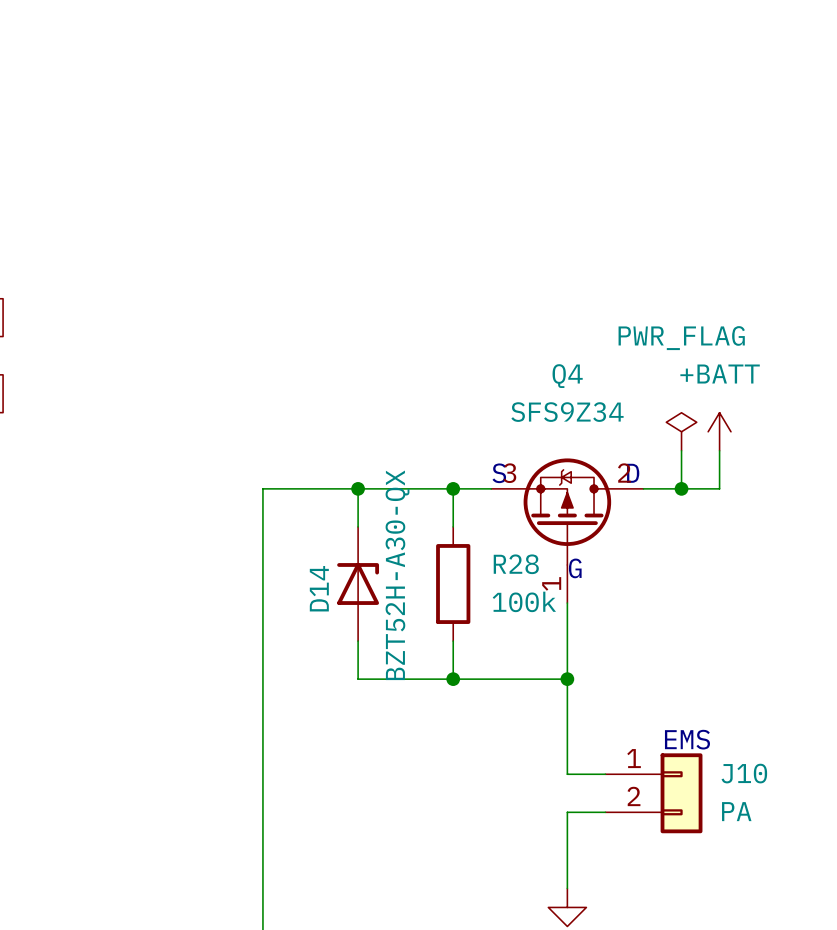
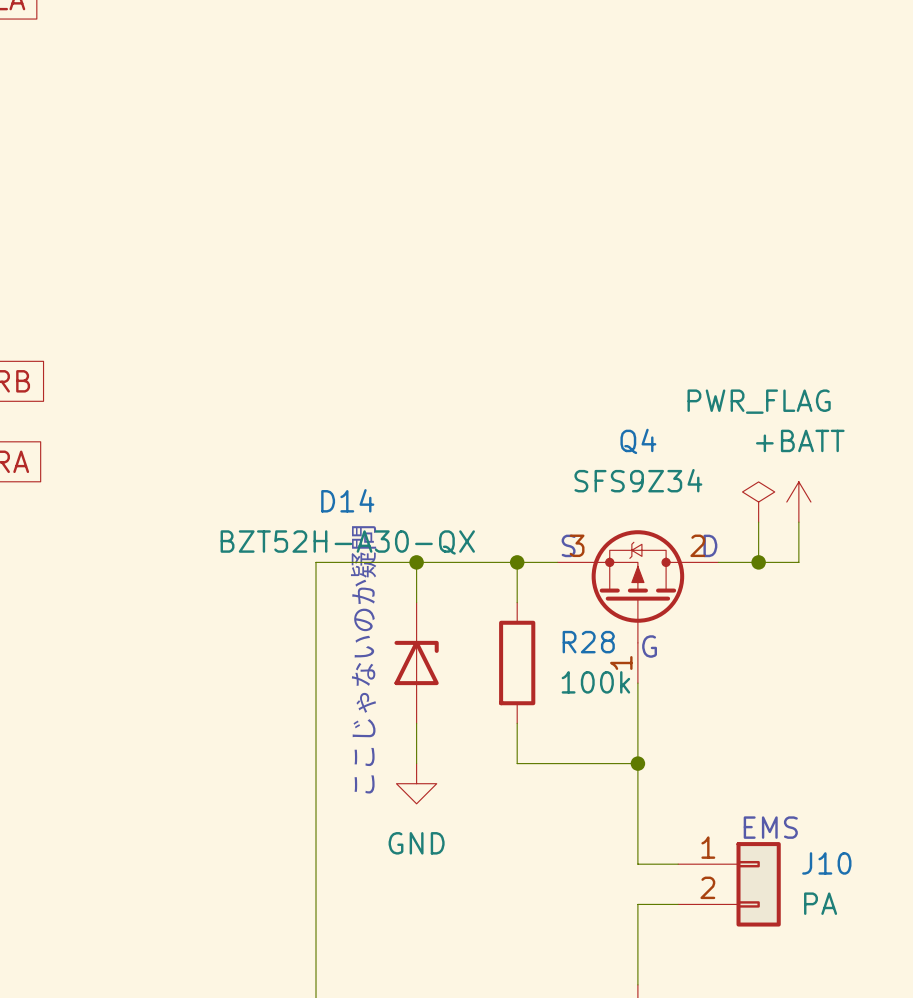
D14 value rotation: 0° (397, 575) -> 90° clockwise (347, 542)
text: none -> ここじゃないのか疑問 (363, 659)
D14 name rotation: 0° (319, 588) -> 90° clockwise (347, 500)
D14 name position: D14 (319, 588) -> D14 (347, 500)
wire: (358, 679) (453, 679) -> none
junction: (453, 679) -> none
power symbol: none -> GND (416, 783)

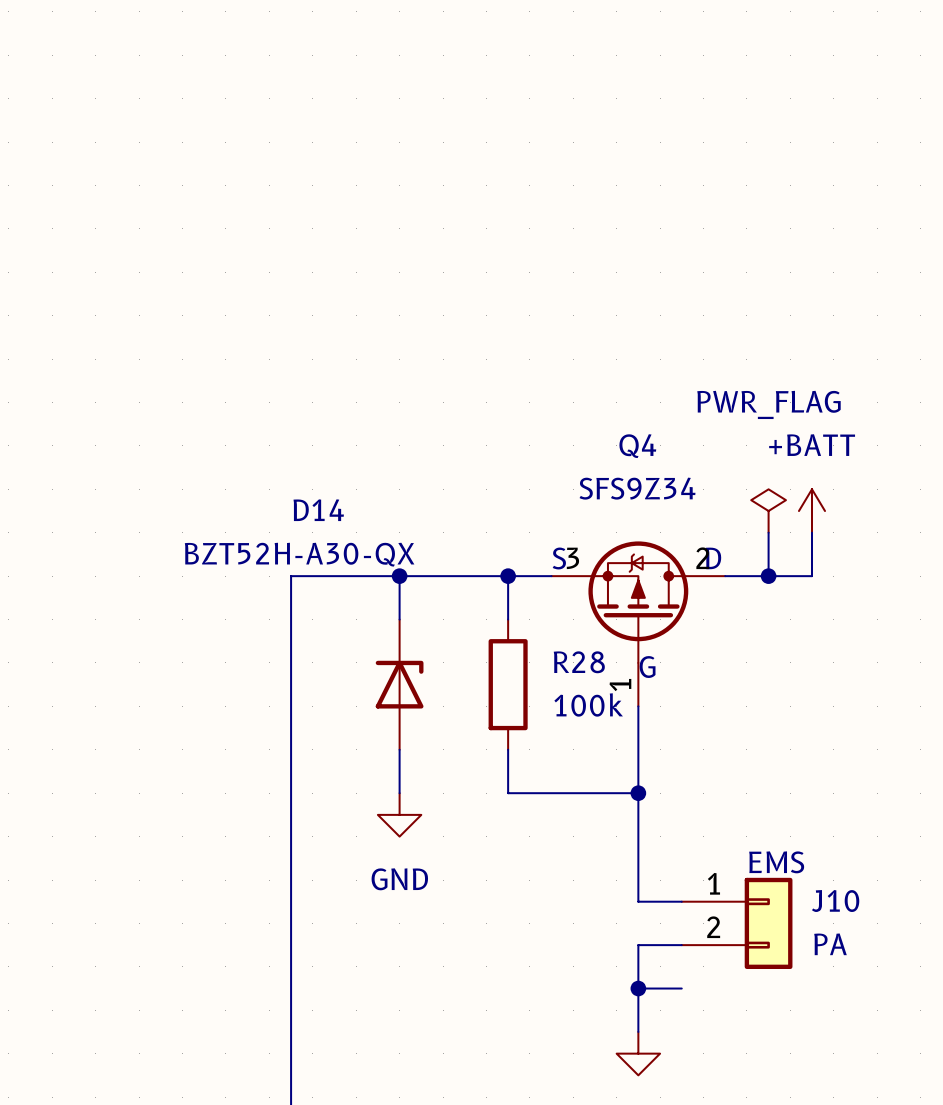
text: ここじゃないのか疑問 (363, 659) -> none
wire: none -> (638, 988) (681, 988)
junction: none -> (638, 988)

